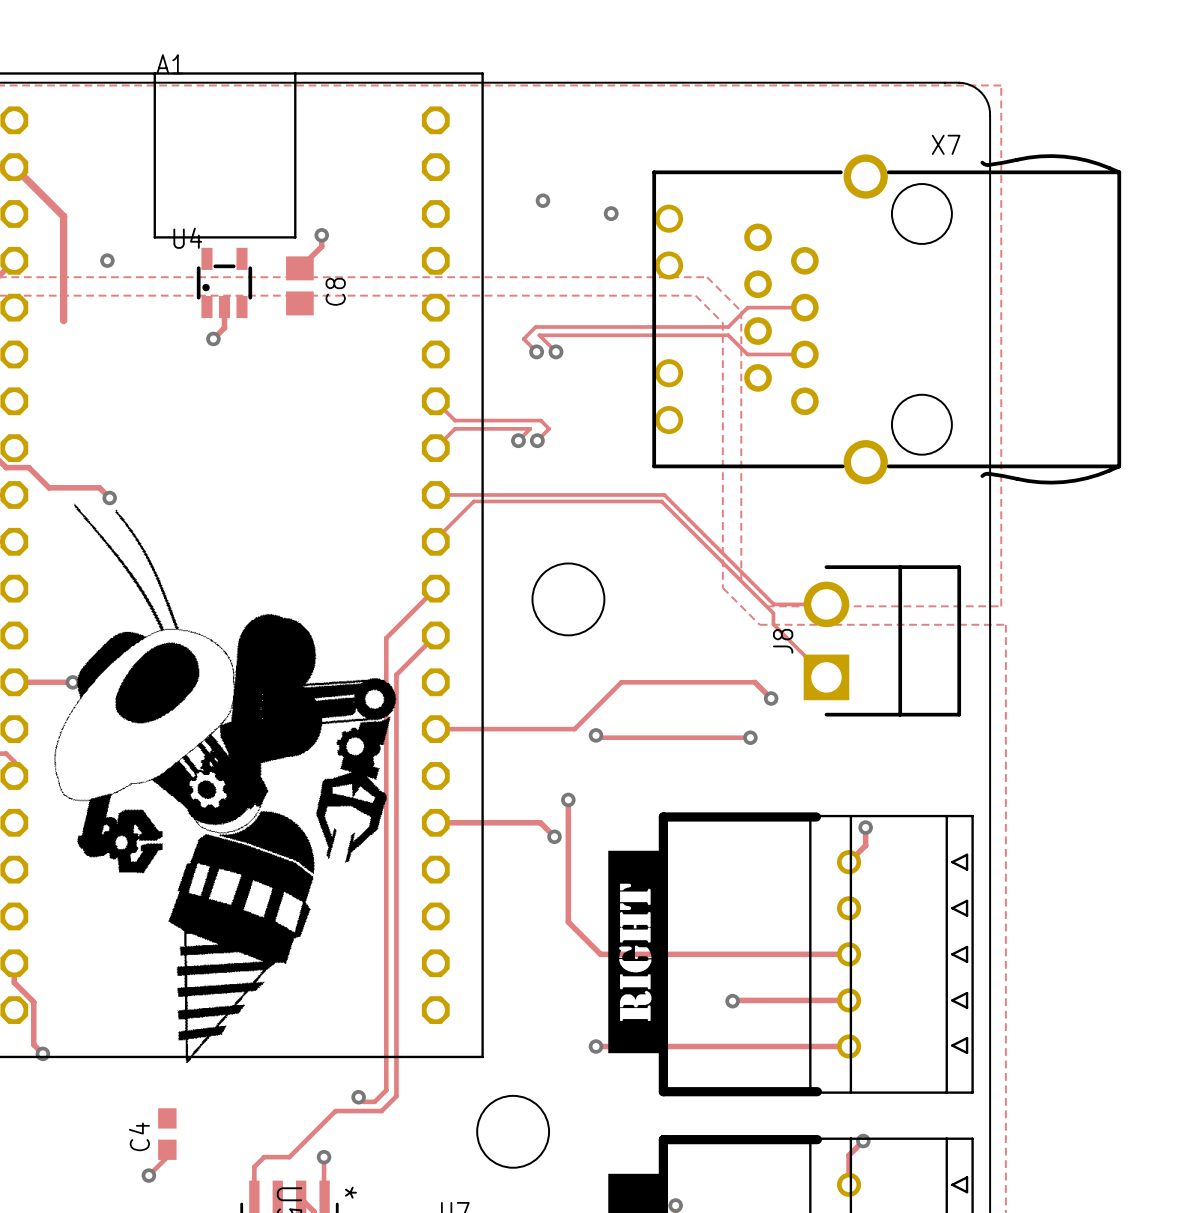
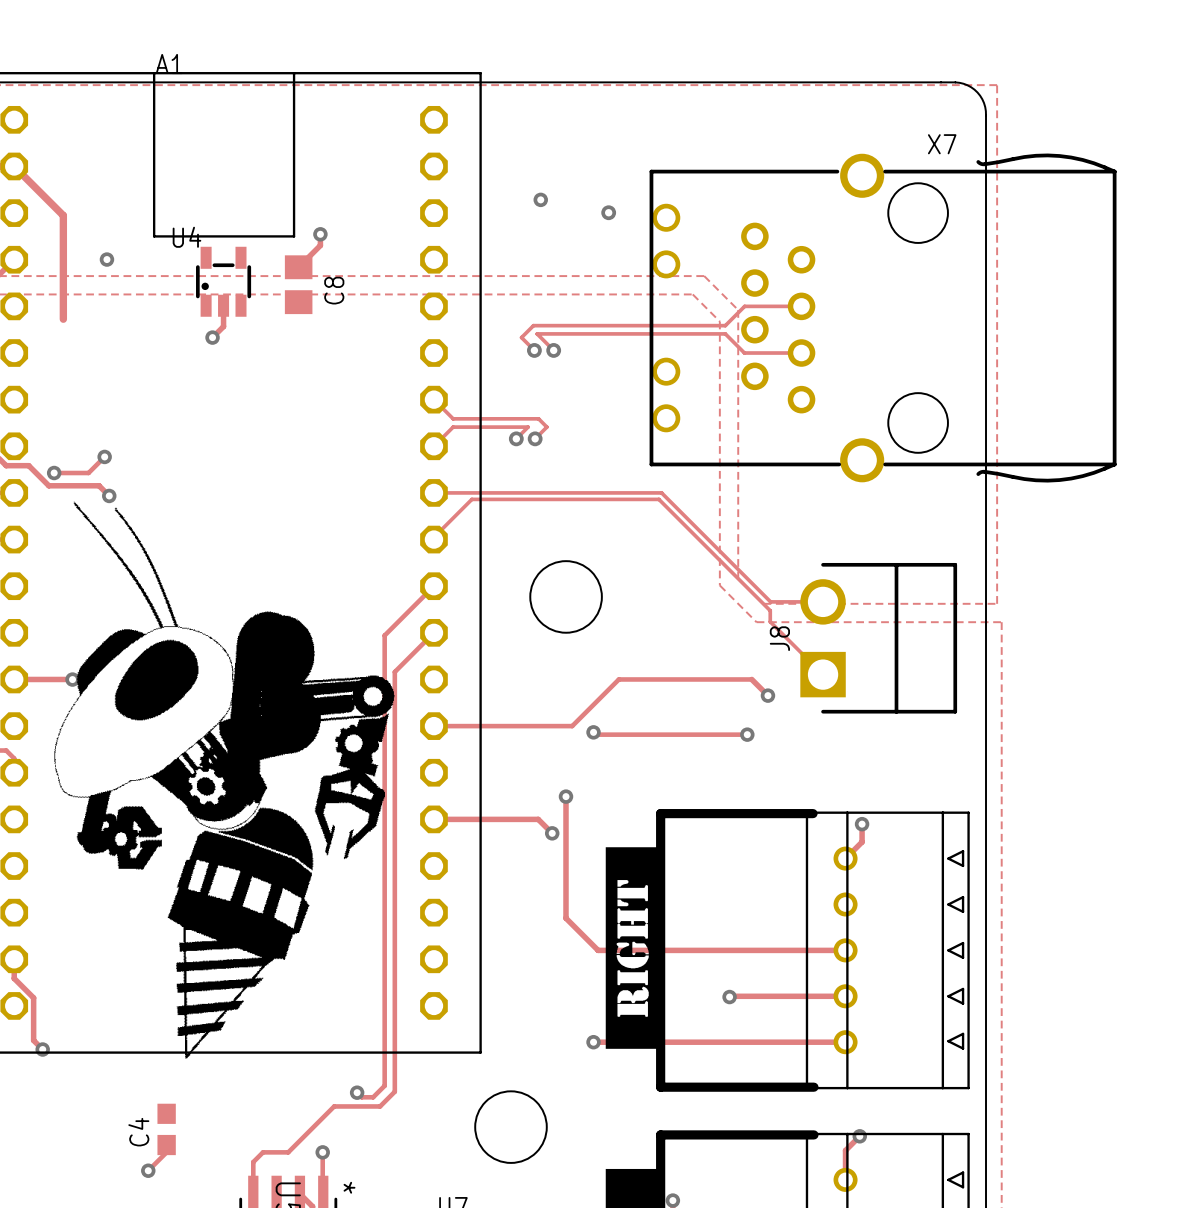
track: none -> (104, 456) (88, 473) (54, 473)
via: none -> (104, 456)
via: none -> (54, 473)

